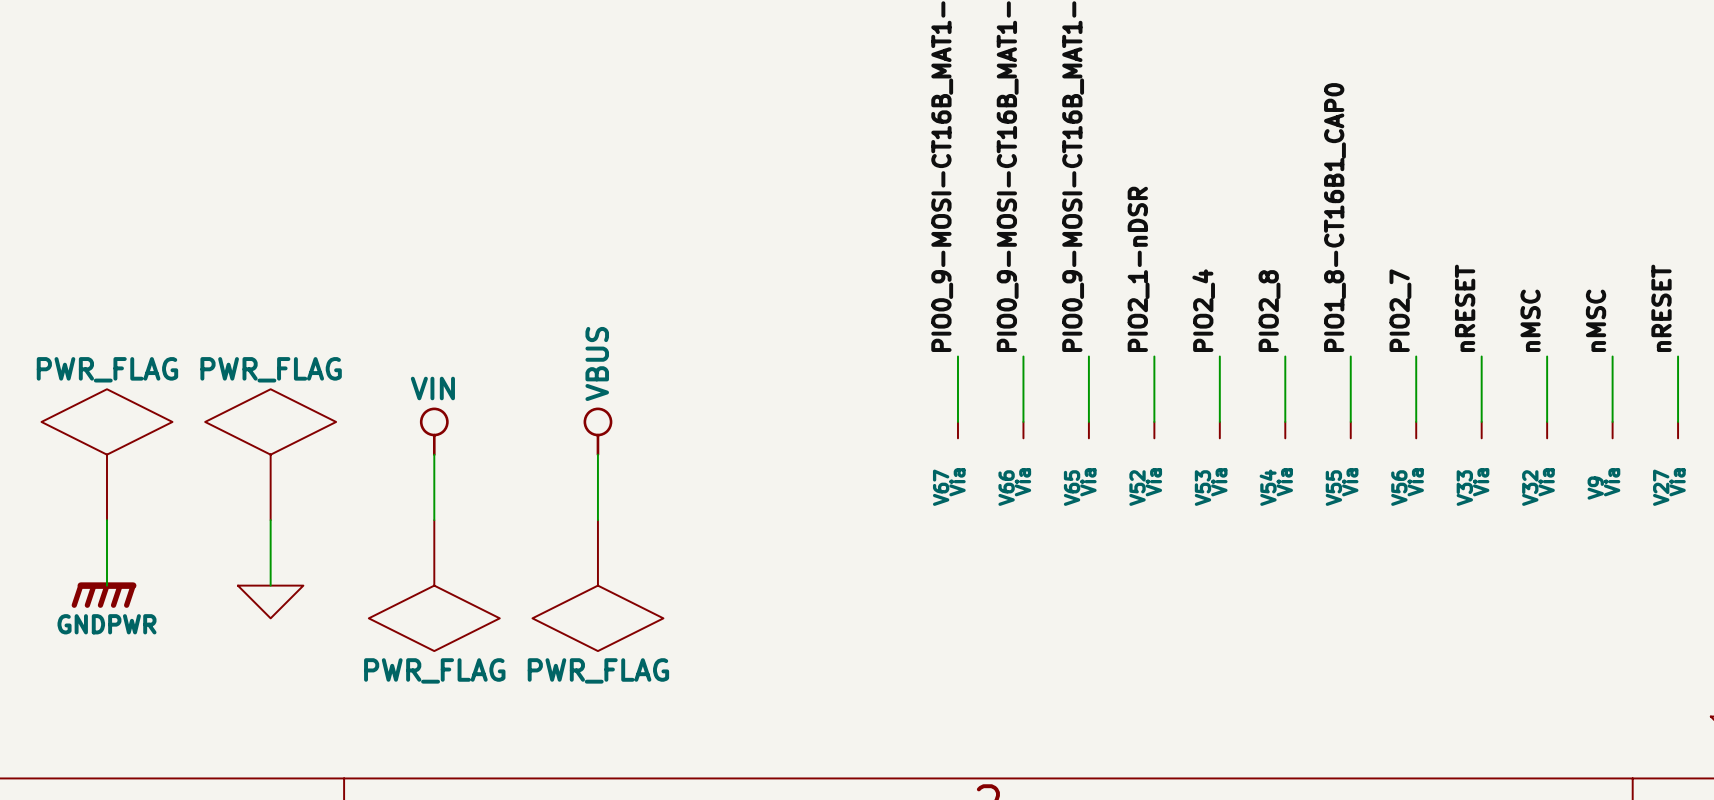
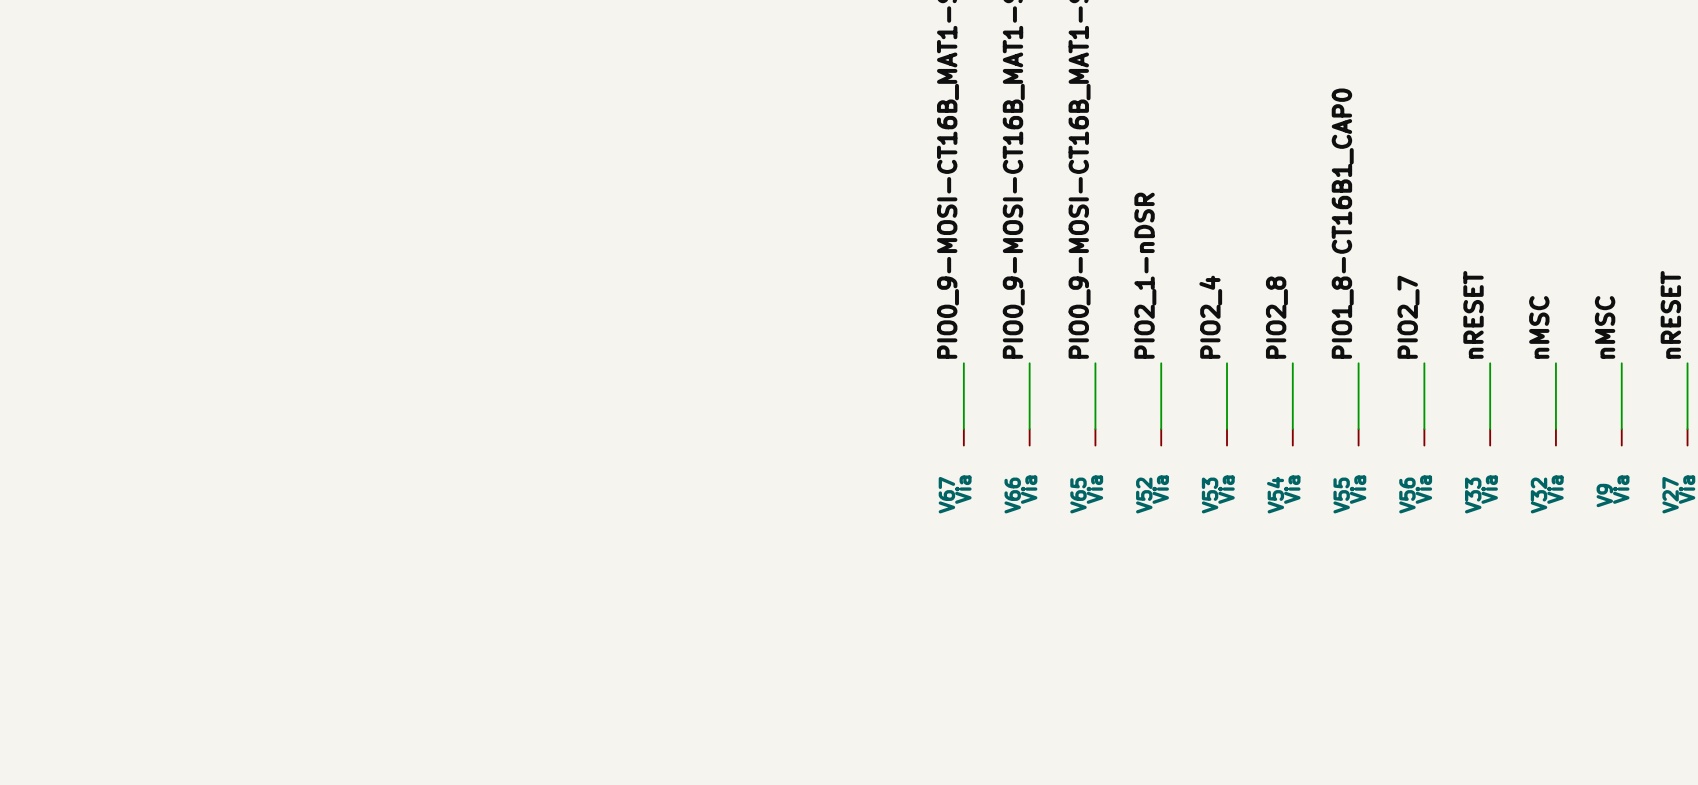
power symbol: VIN (434, 431) -> none
power symbol: VBUS (597, 431) -> none
power symbol: PWR_FLAG (106, 454) -> none
power symbol: PWR_FLAG (270, 454) -> none
wire: (434, 454) (434, 520) -> none
wire: (597, 454) (597, 520) -> none
wire: (106, 520) (106, 585) -> none
wire: (270, 520) (270, 585) -> none
power symbol: PWR_FLAG (434, 585) -> none
power symbol: PWR_FLAG (597, 585) -> none
power symbol: GNDPWR (104, 595) -> none
power symbol: (270, 601) -> none

